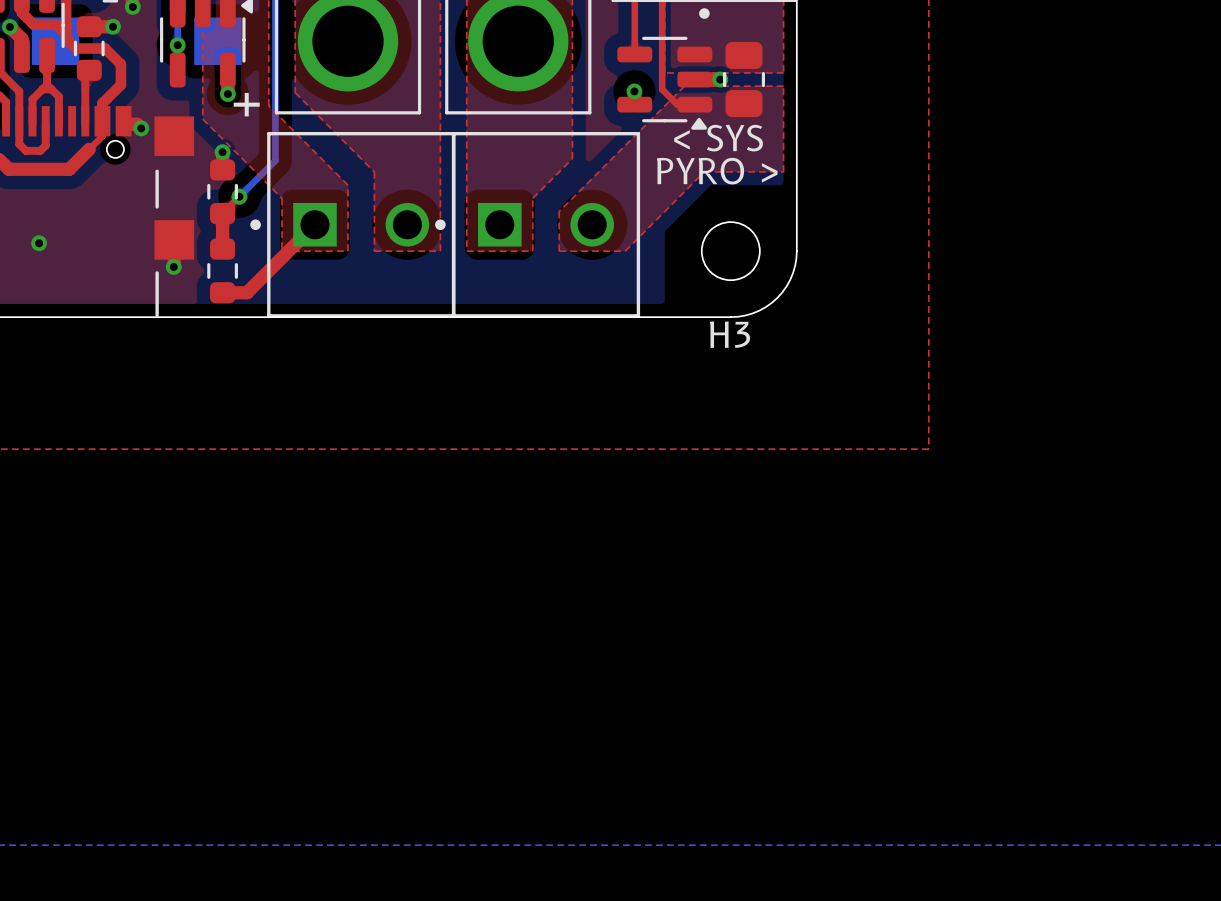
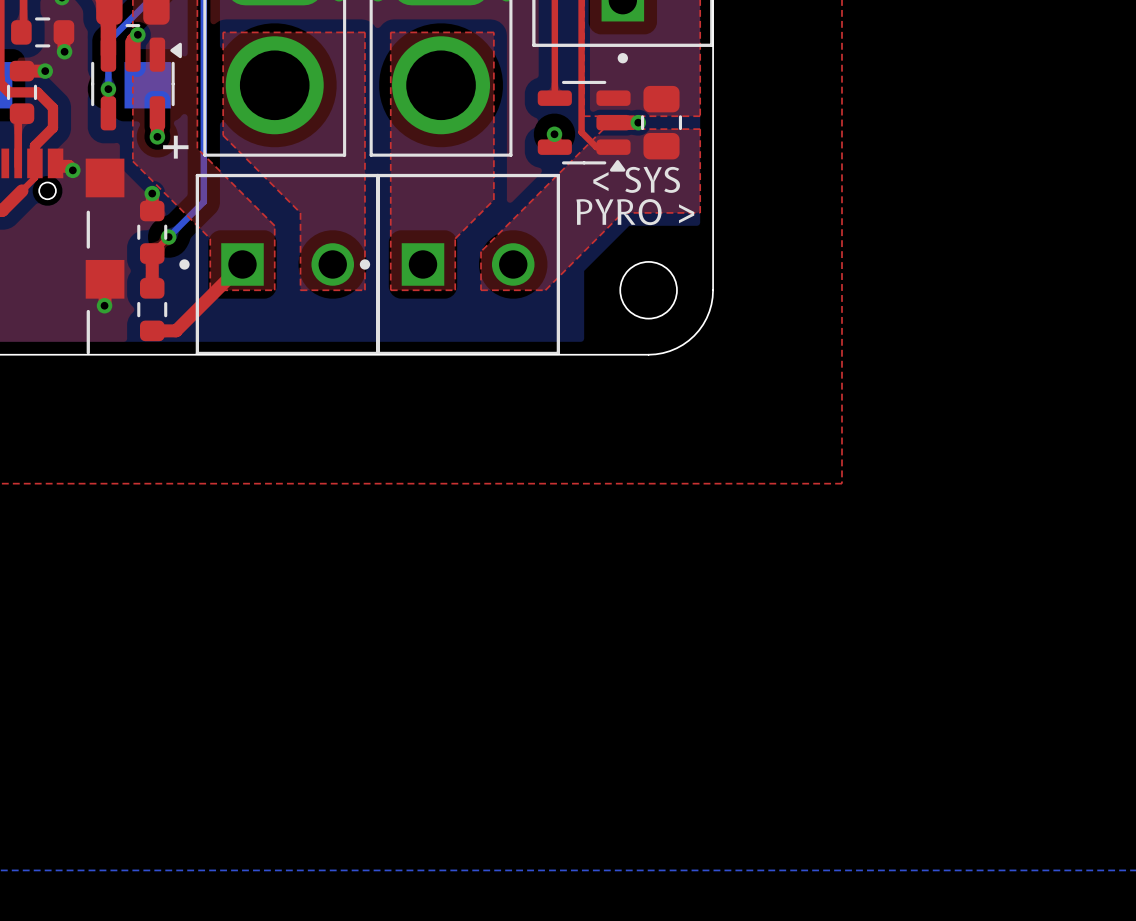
H3 name: H3 (730, 334) -> none

